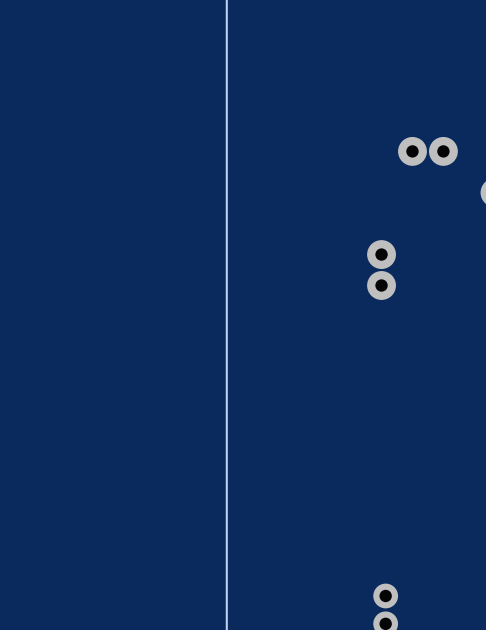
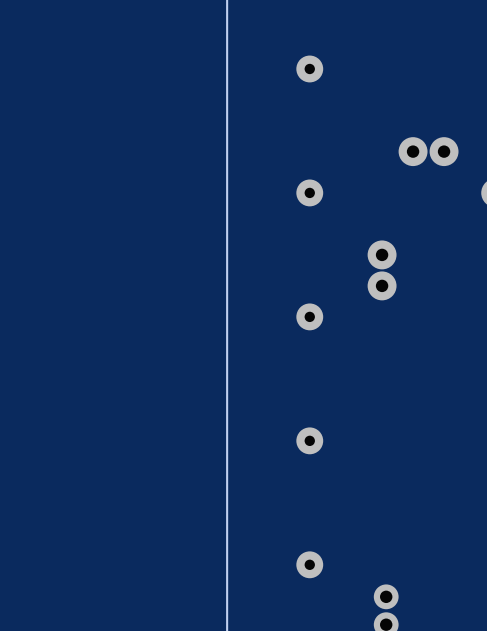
via: none -> (309, 68)
via: none -> (309, 192)
via: none -> (309, 316)
via: none -> (309, 440)
via: none -> (309, 564)

